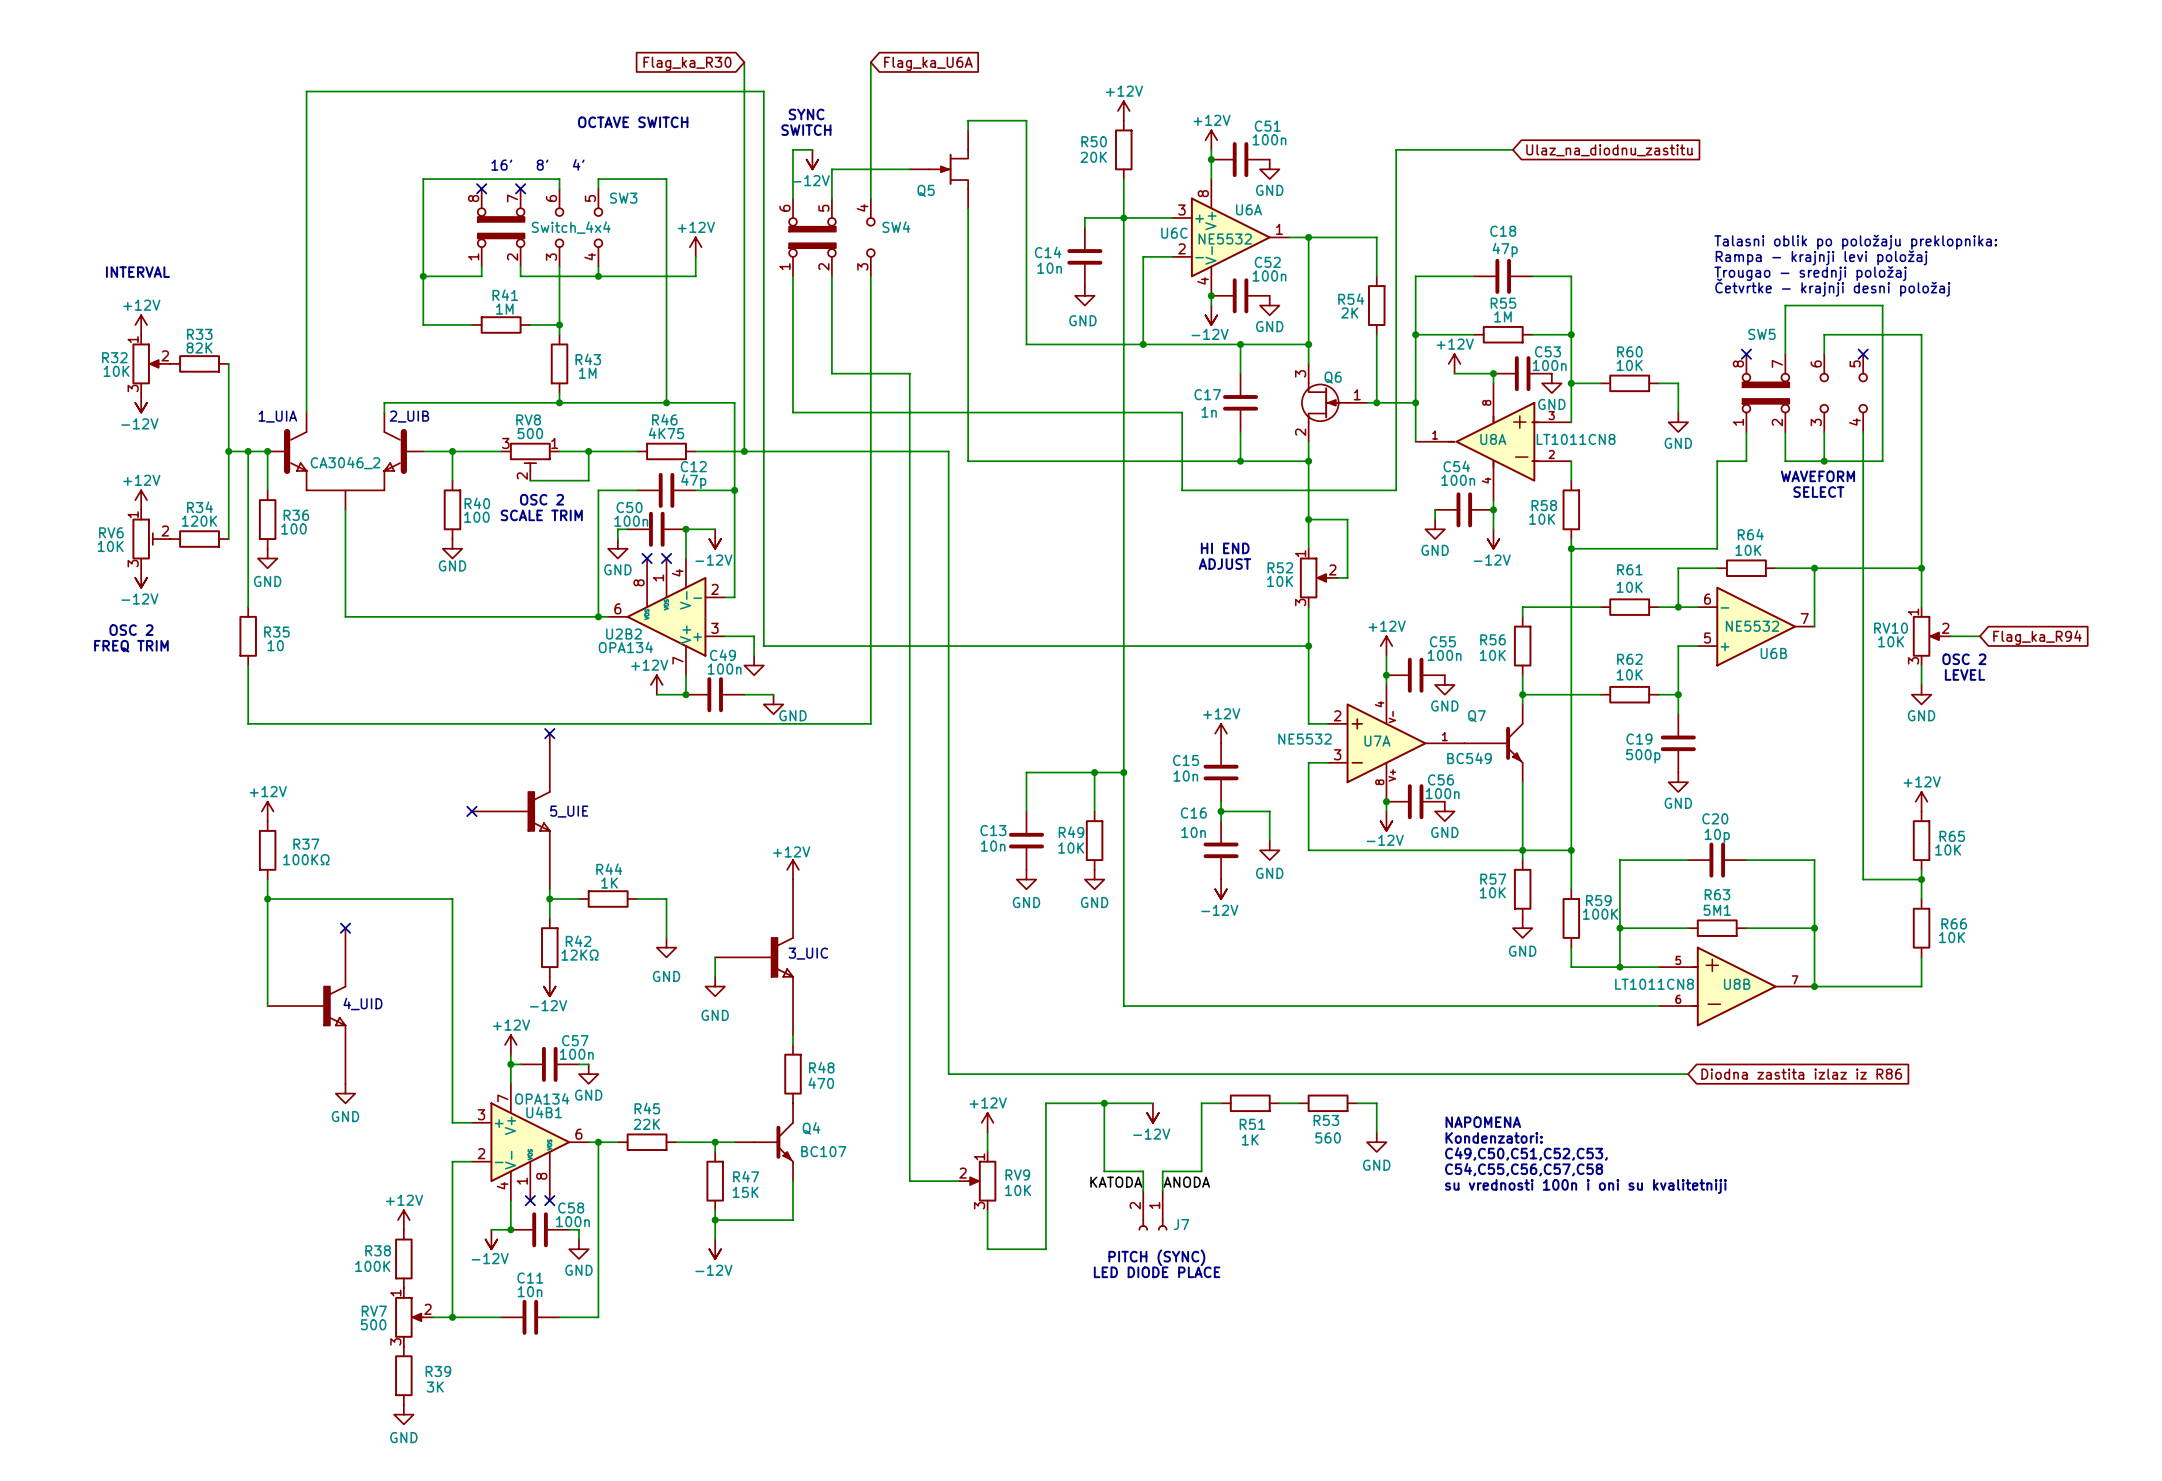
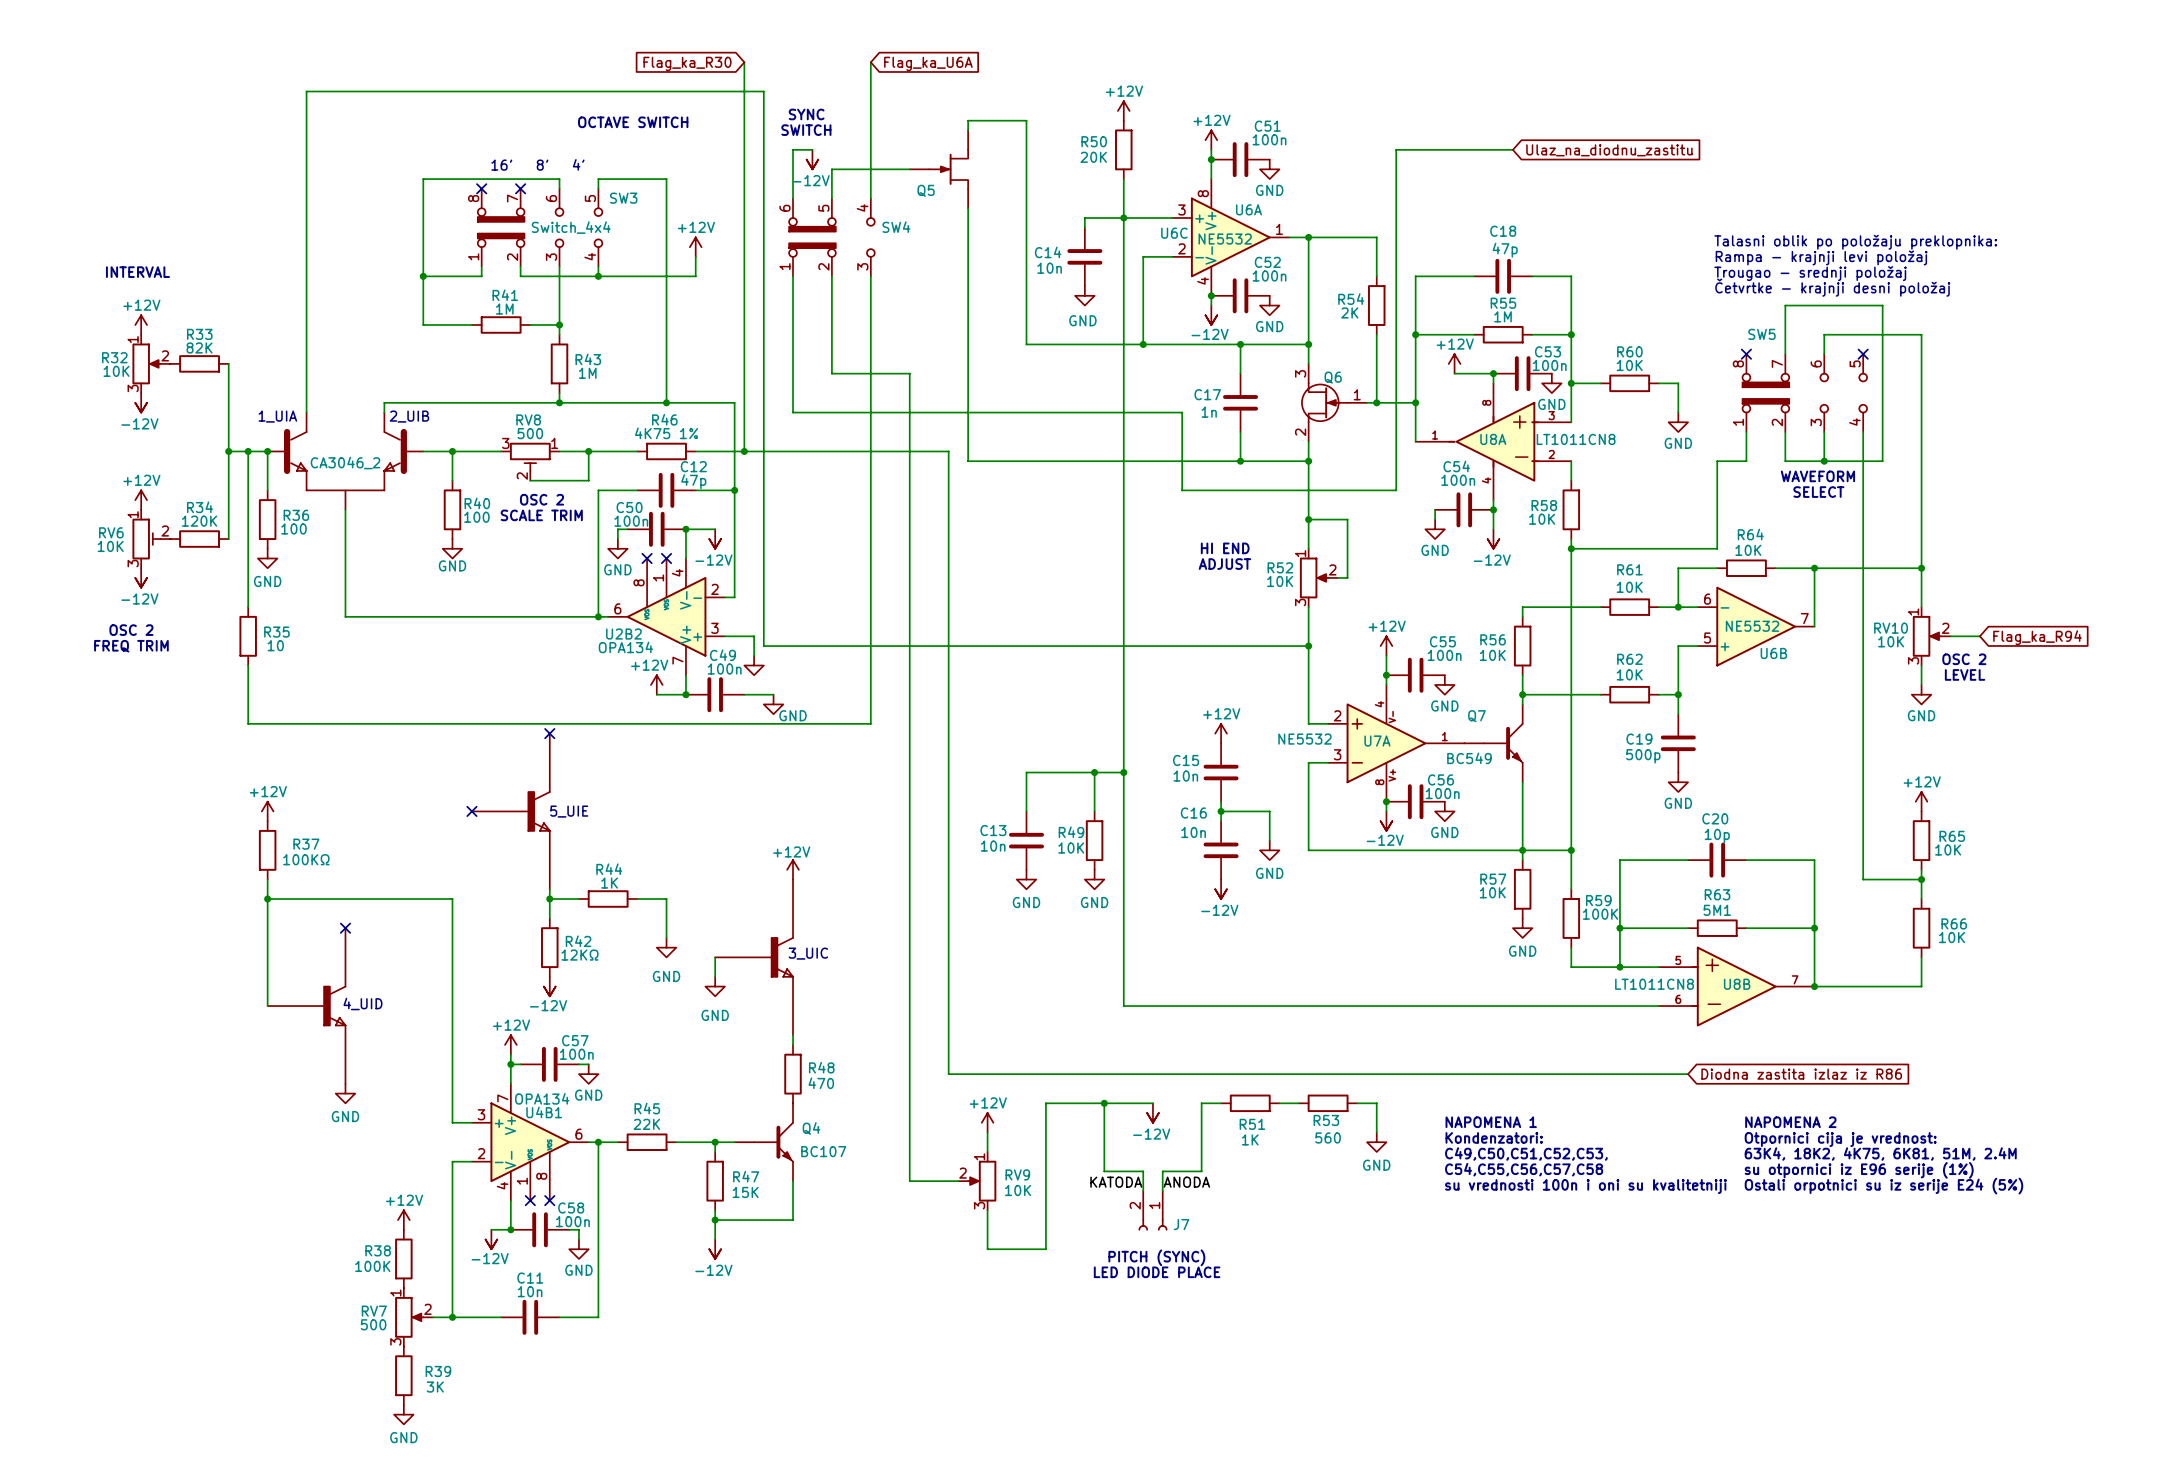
R46 value: 4K75 (666, 433) -> 4K75 1% (666, 433)
text: NAPOMENA (1483, 1122) -> NAPOMENA 1 (1491, 1122)
text: none -> NAPOMENA 2 (1790, 1122)
text: none -> Otpornici cija je vrednost: (1840, 1139)
text: none -> 63K4, 18K2, 4K75, 6K81, 51M, 2.4M (1880, 1154)
text: none -> su otpornici iz E96 serije (1%) (1859, 1170)
text: none -> Ostali orpotnici su iz serije E24 (5%) (1883, 1186)

